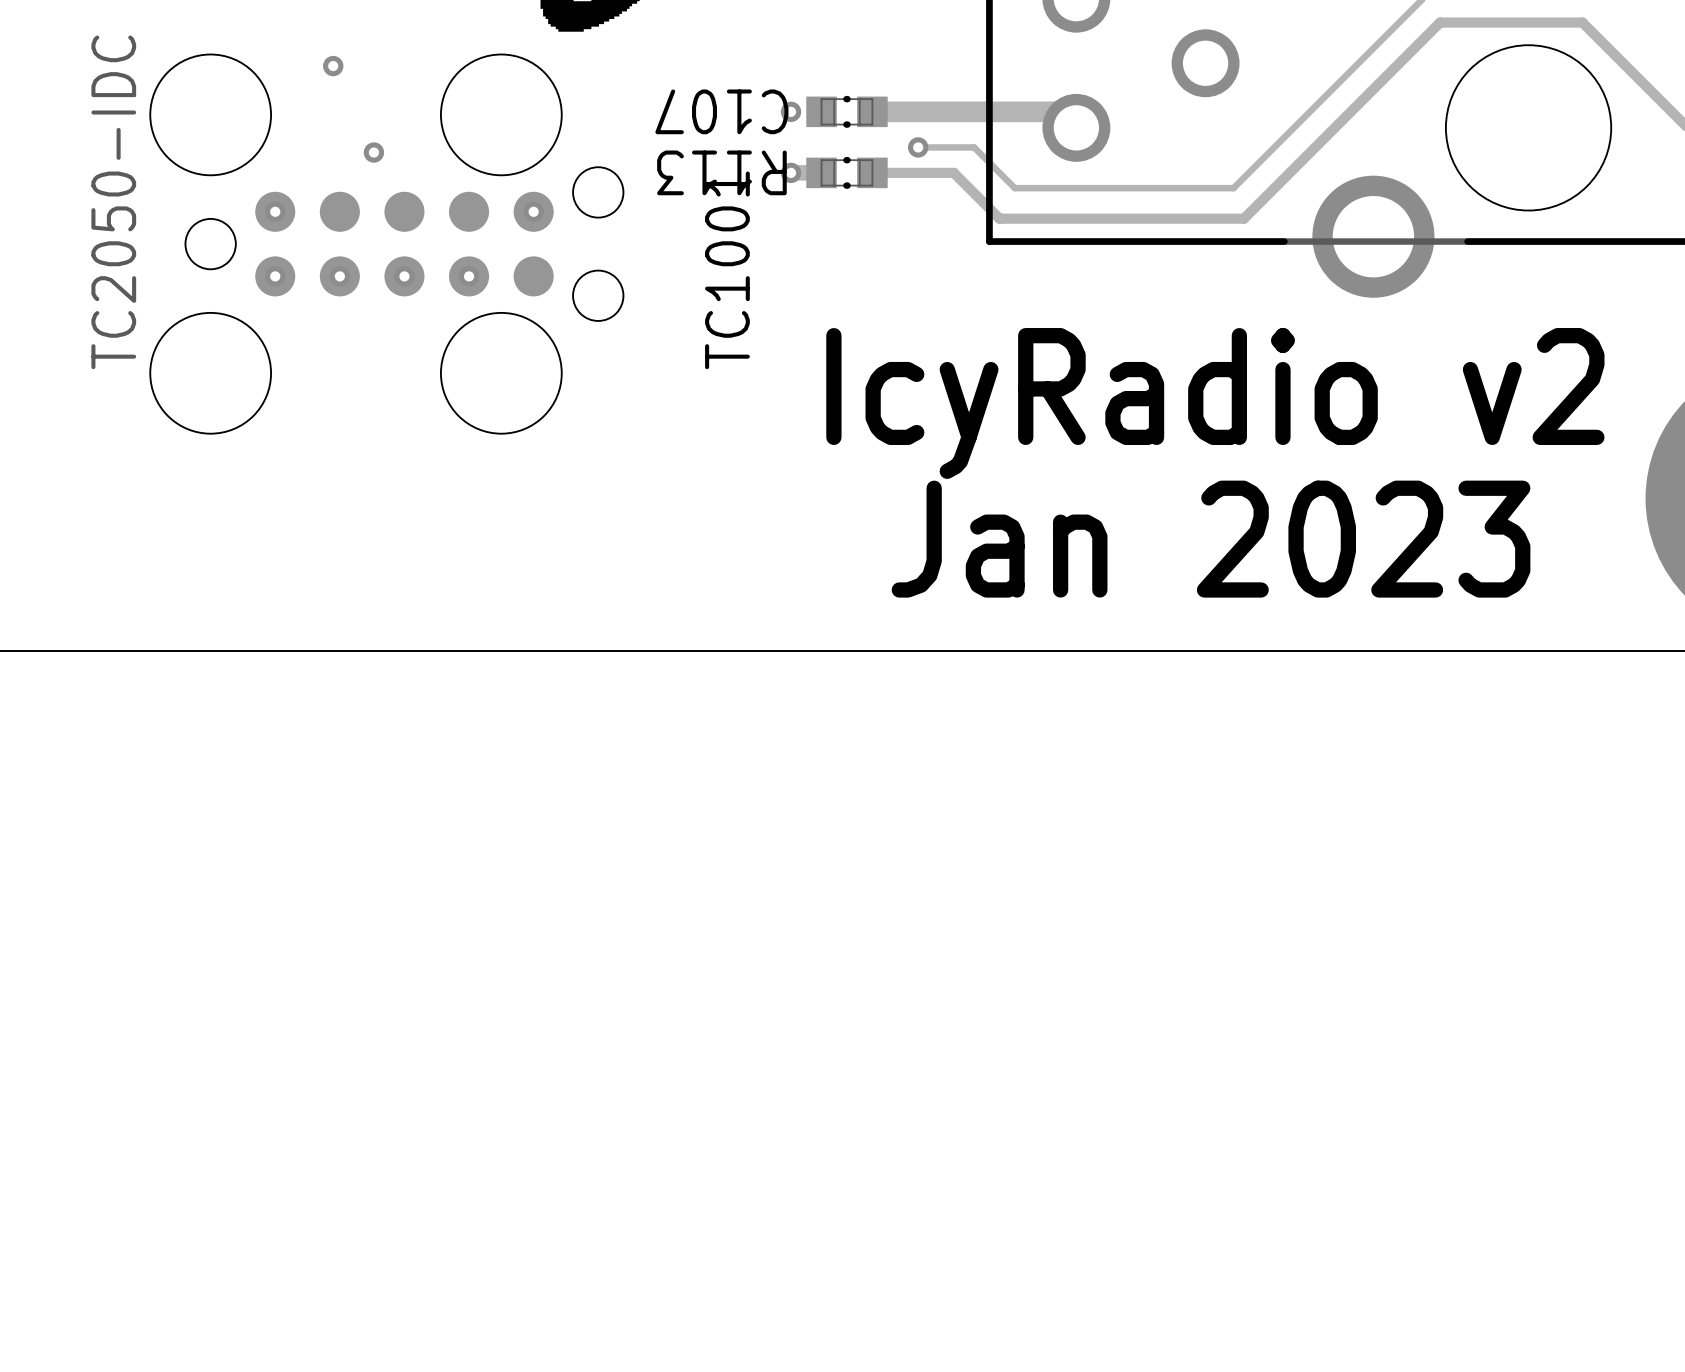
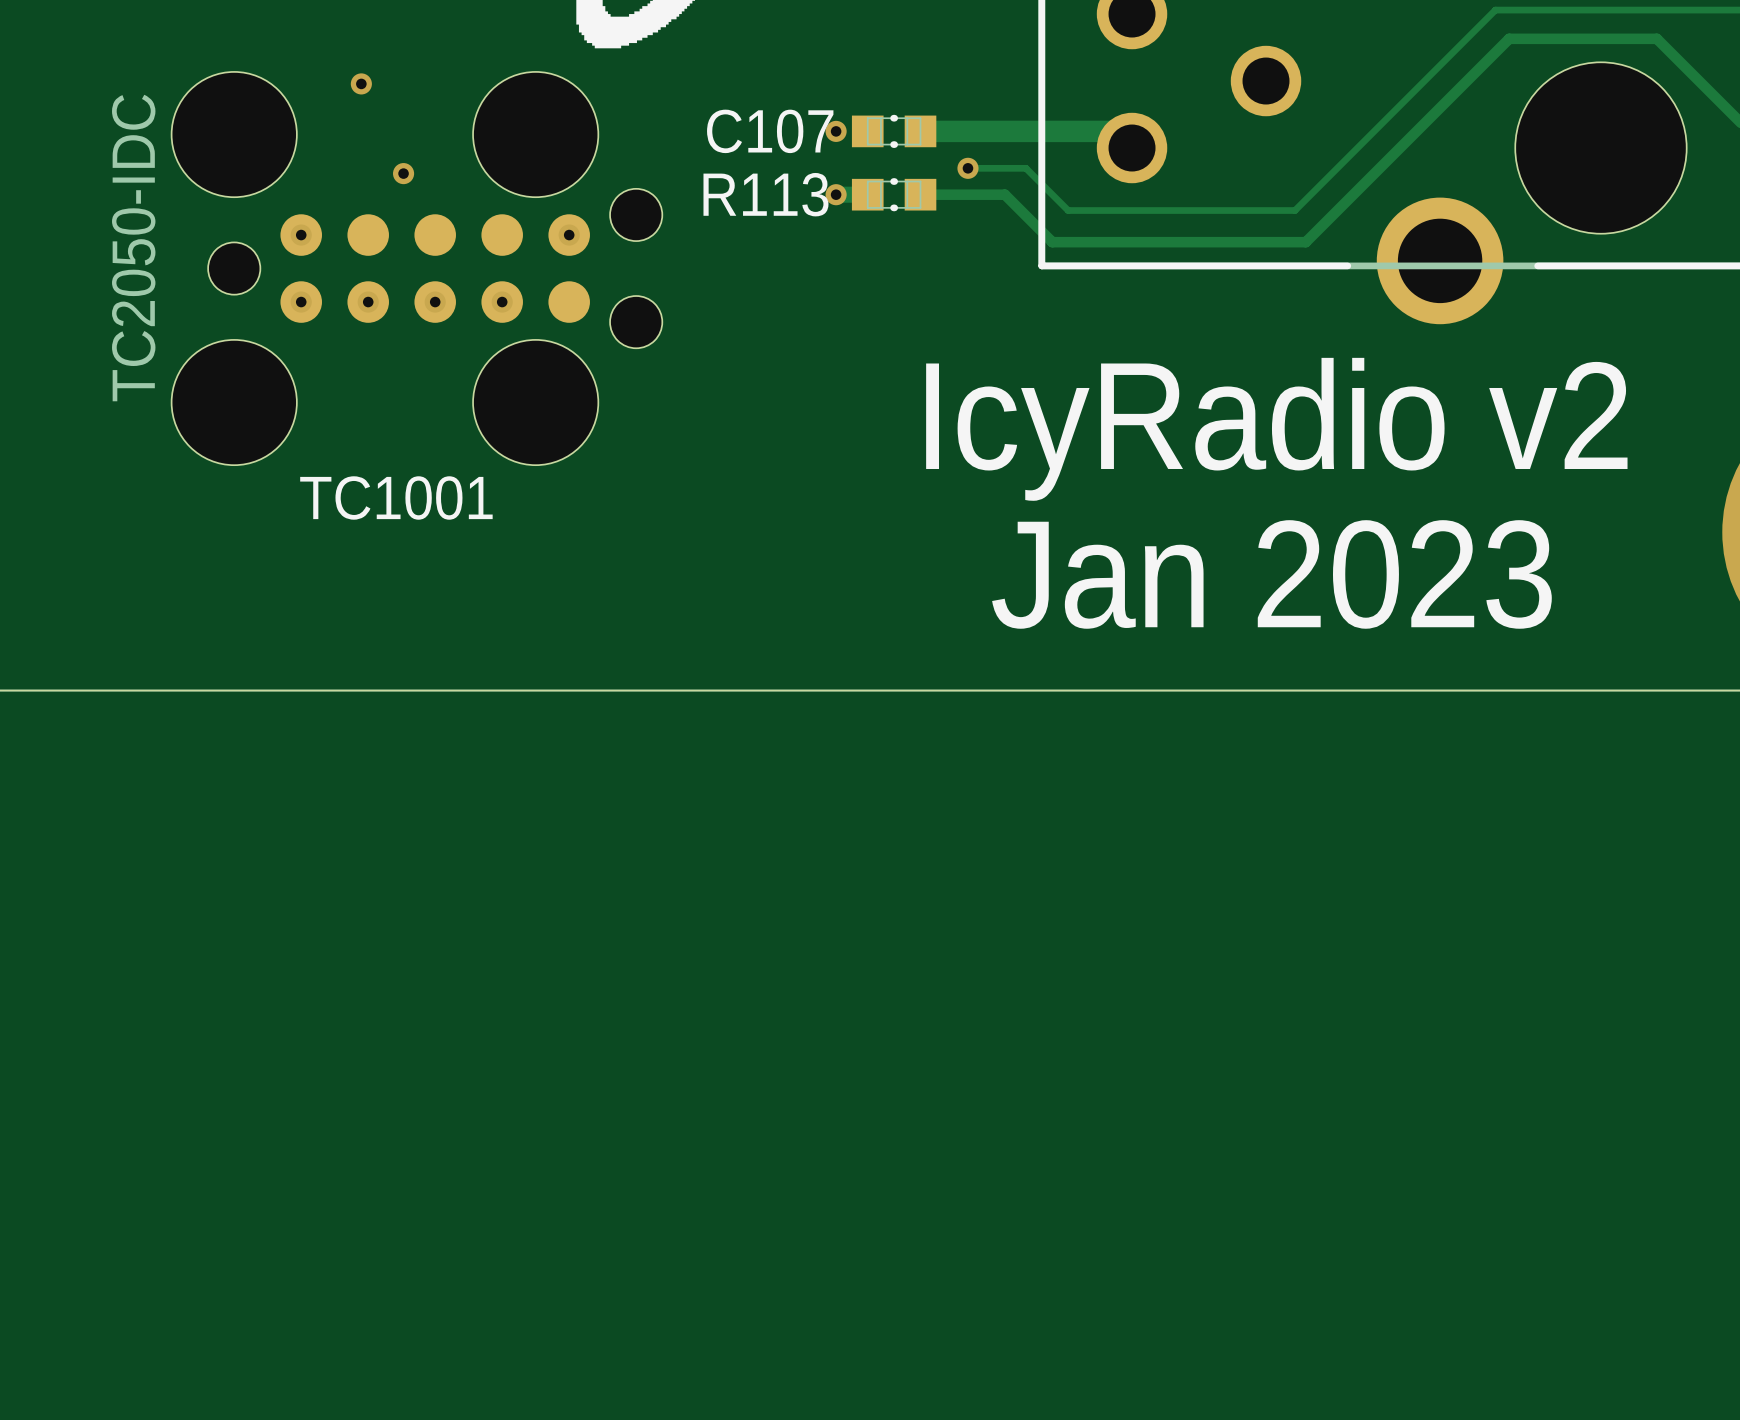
C107 name rotation: 0° (721, 111) -> 180° (770, 131)
R113 name rotation: 0° (721, 172) -> 180° (765, 194)
TC1001 name rotation: 0° (727, 270) -> 90° clockwise (396, 497)
TC1001 name position: TC1001 (727, 270) -> TC1001 (396, 497)

